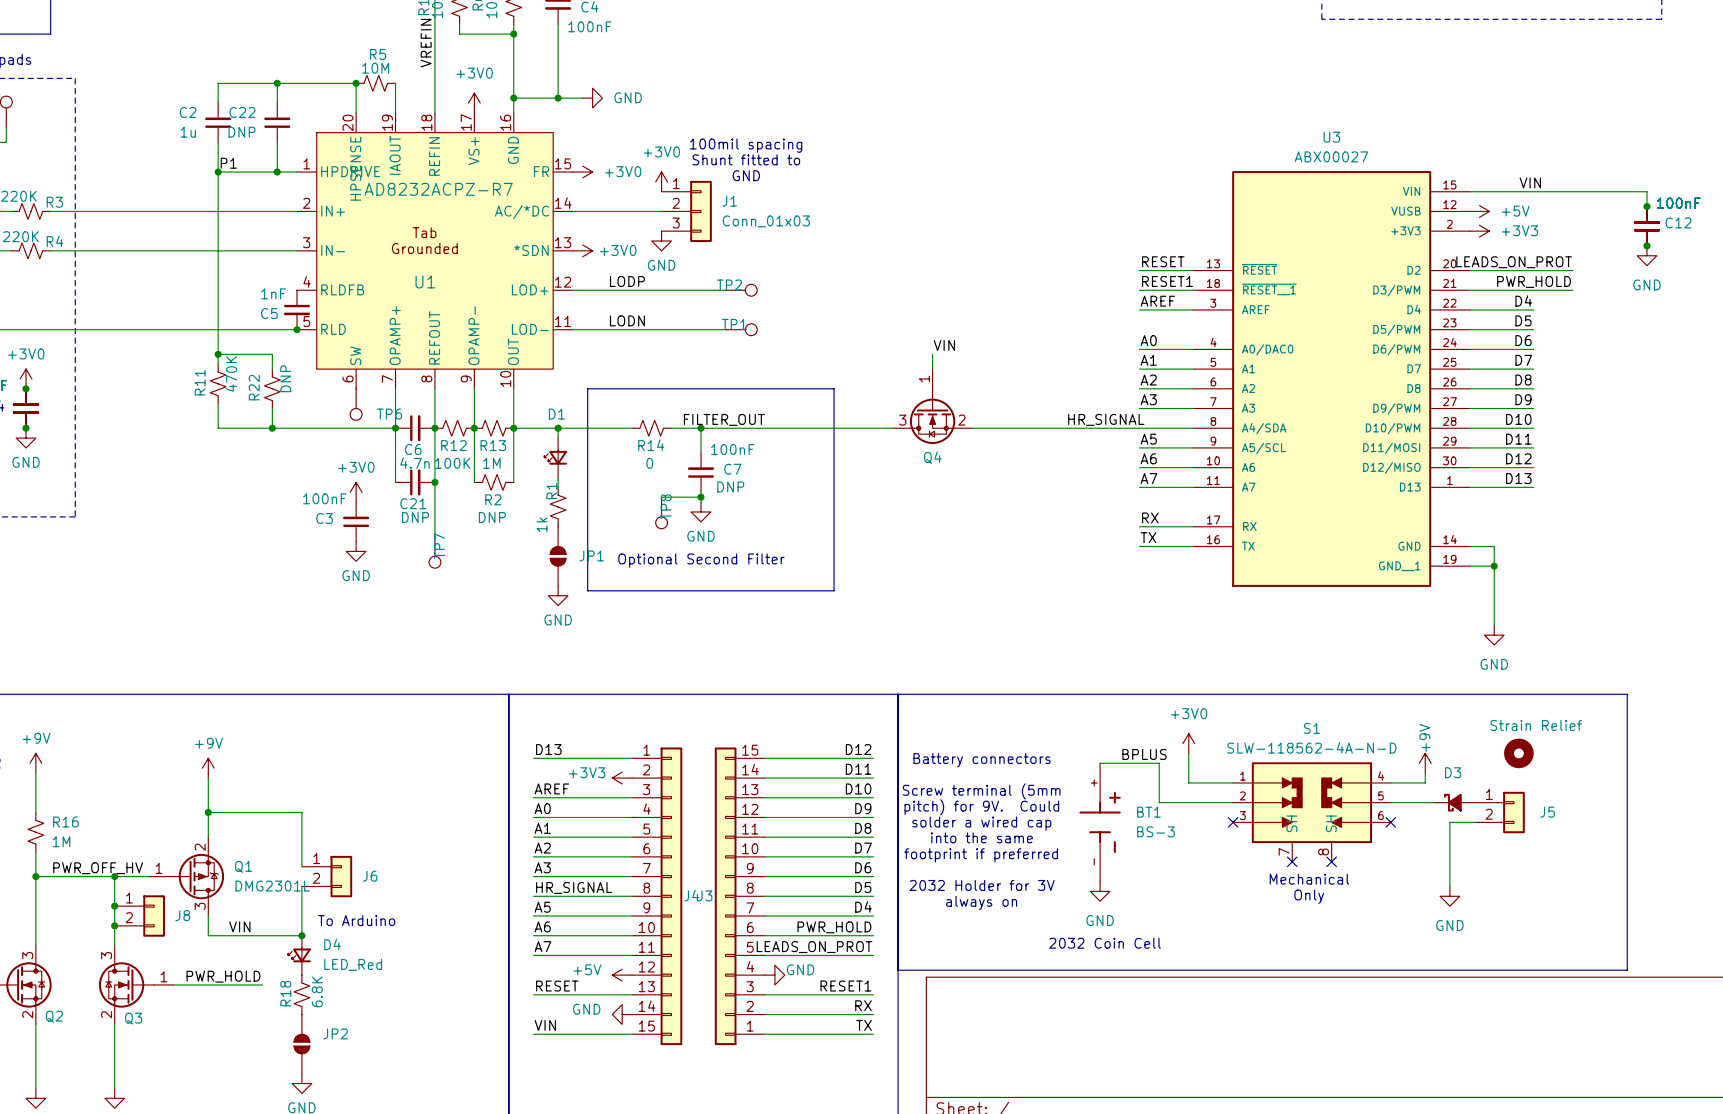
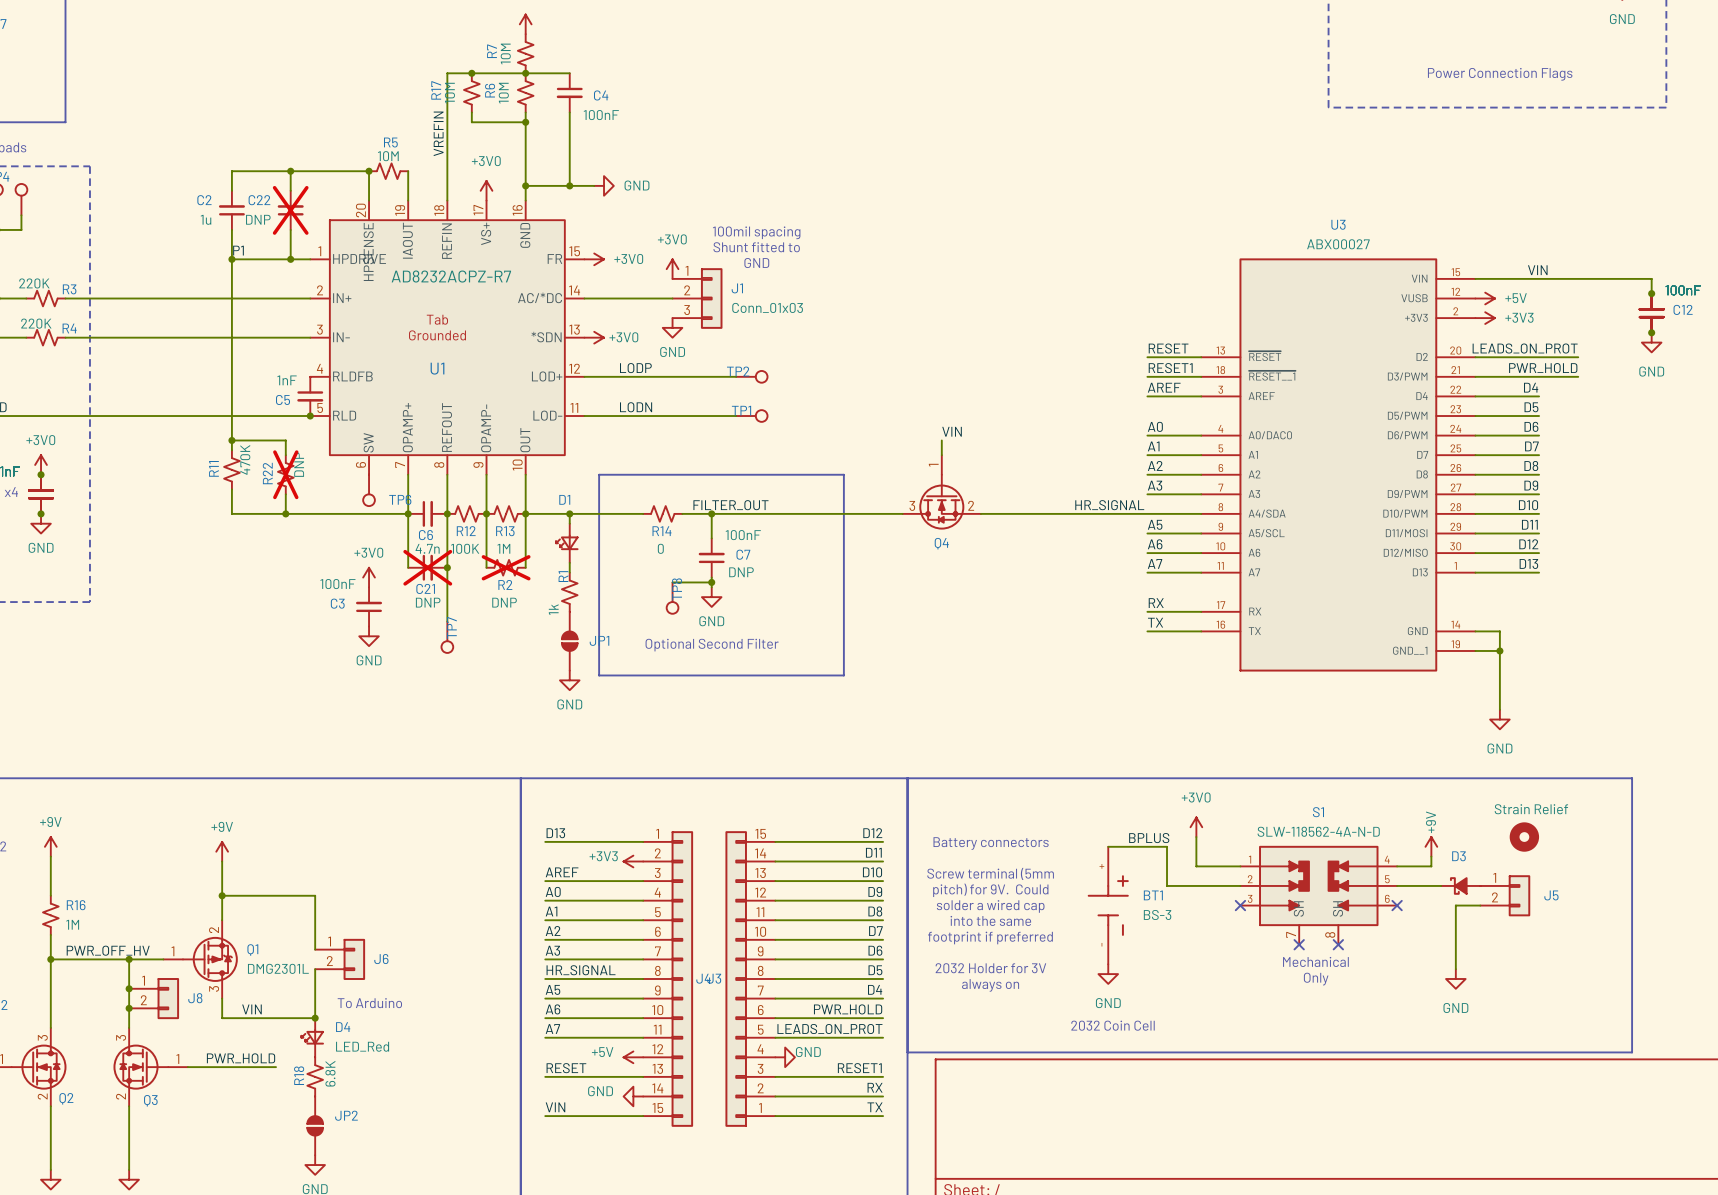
C22 do-not-place cross: none -> (290, 210)
R22 do-not-place cross: none -> (285, 474)
C21 do-not-place cross: none -> (427, 567)
R2 do-not-place cross: none -> (506, 567)

